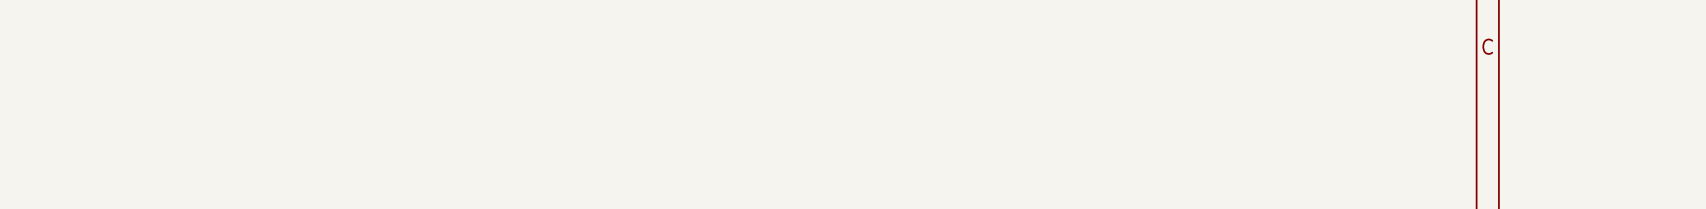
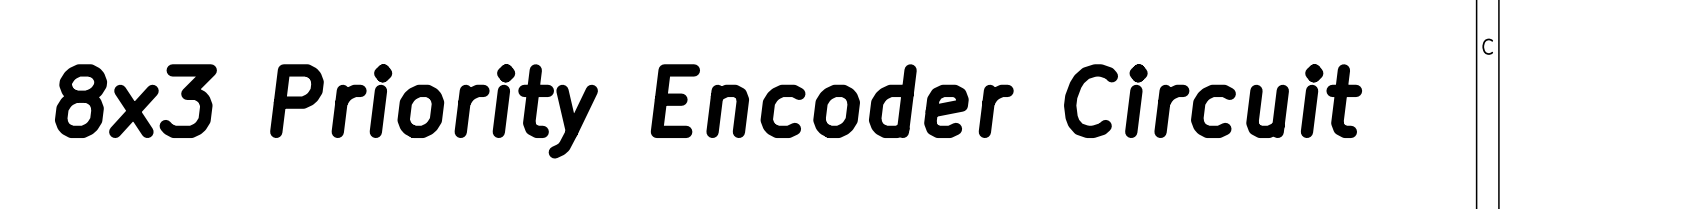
text: none -> 8x3 Priority Encoder Circuit (708, 111)

